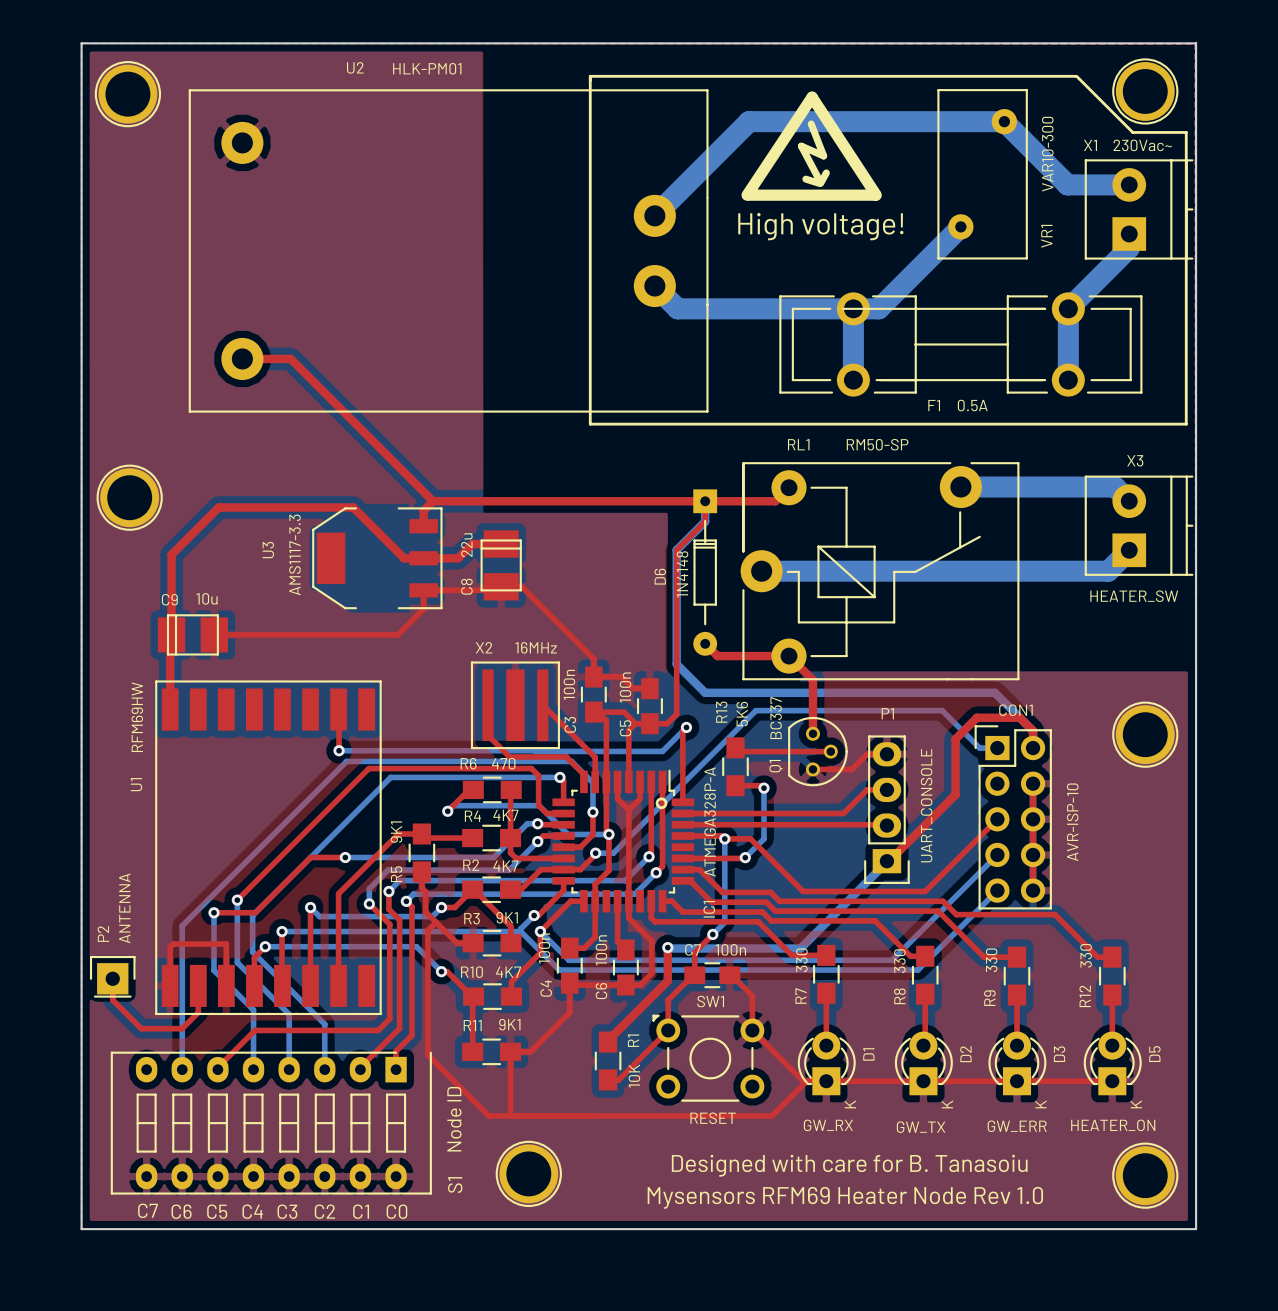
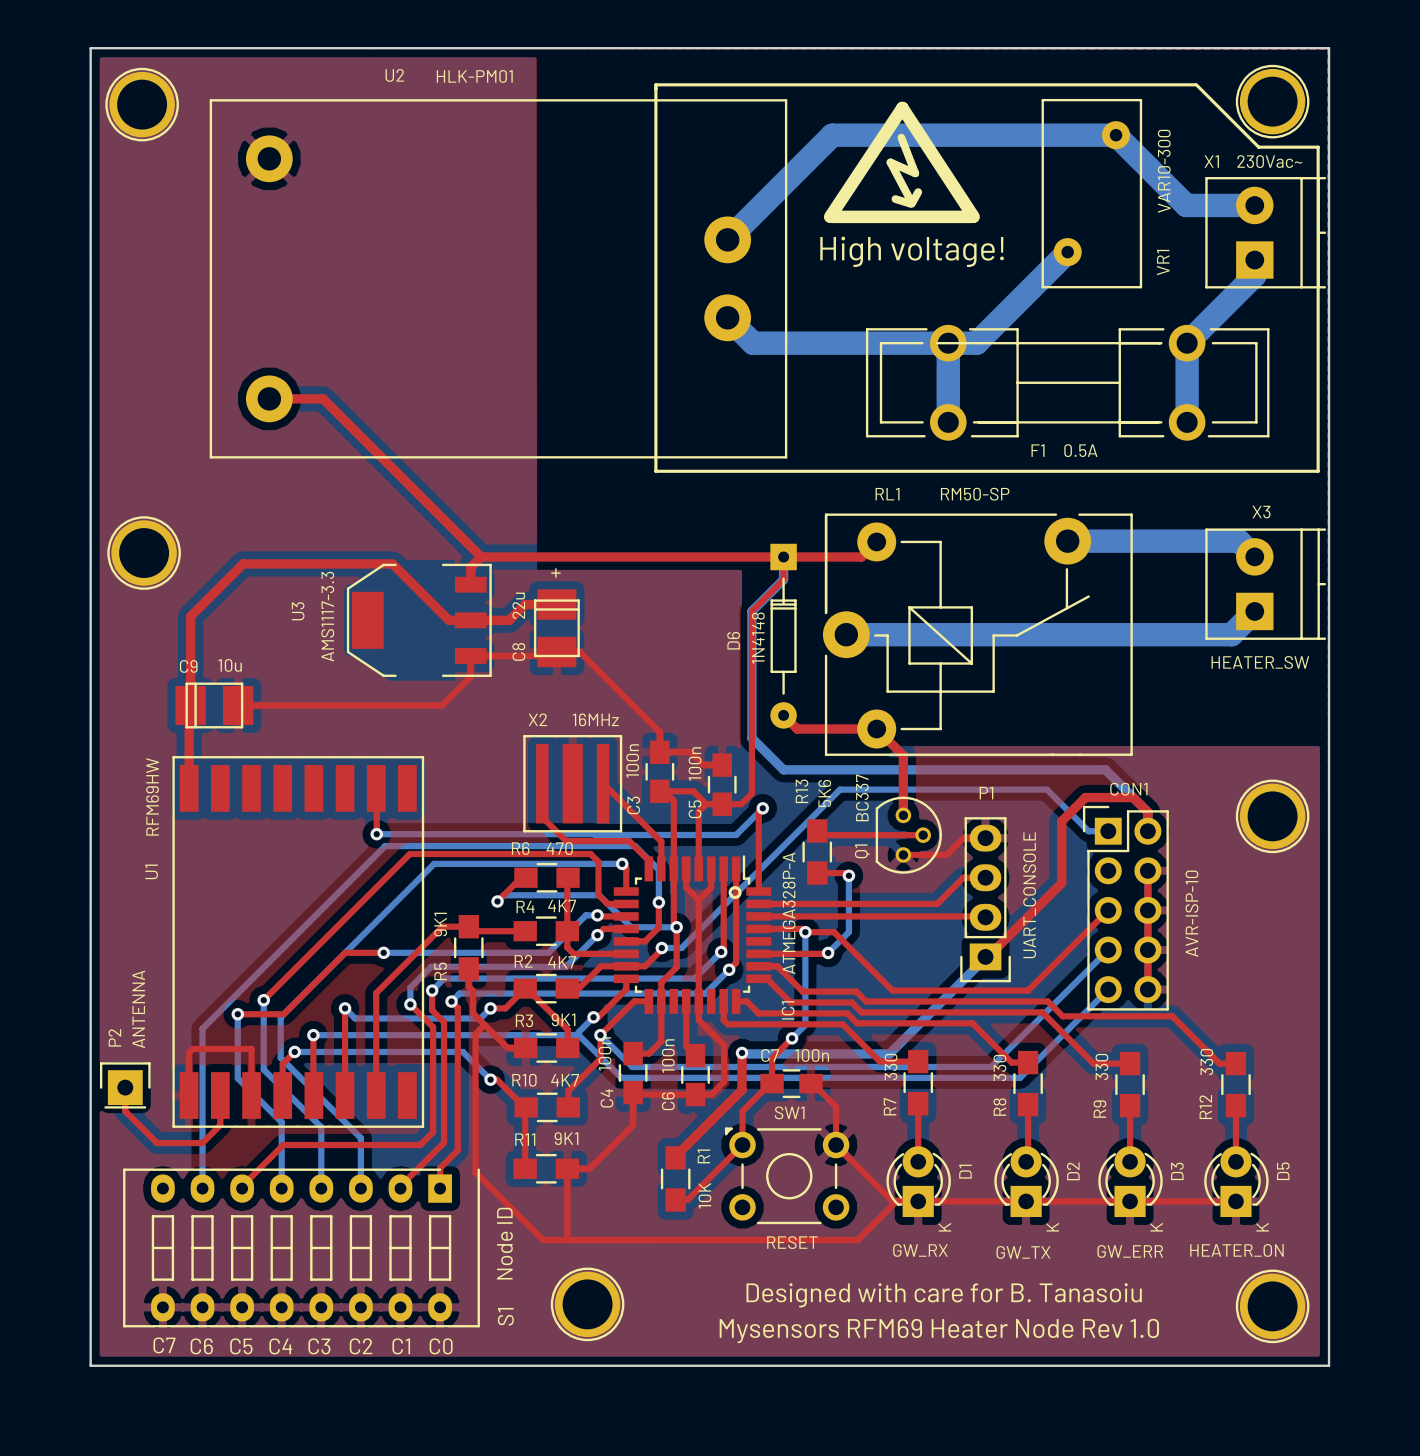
text: none -> + (555, 572)

